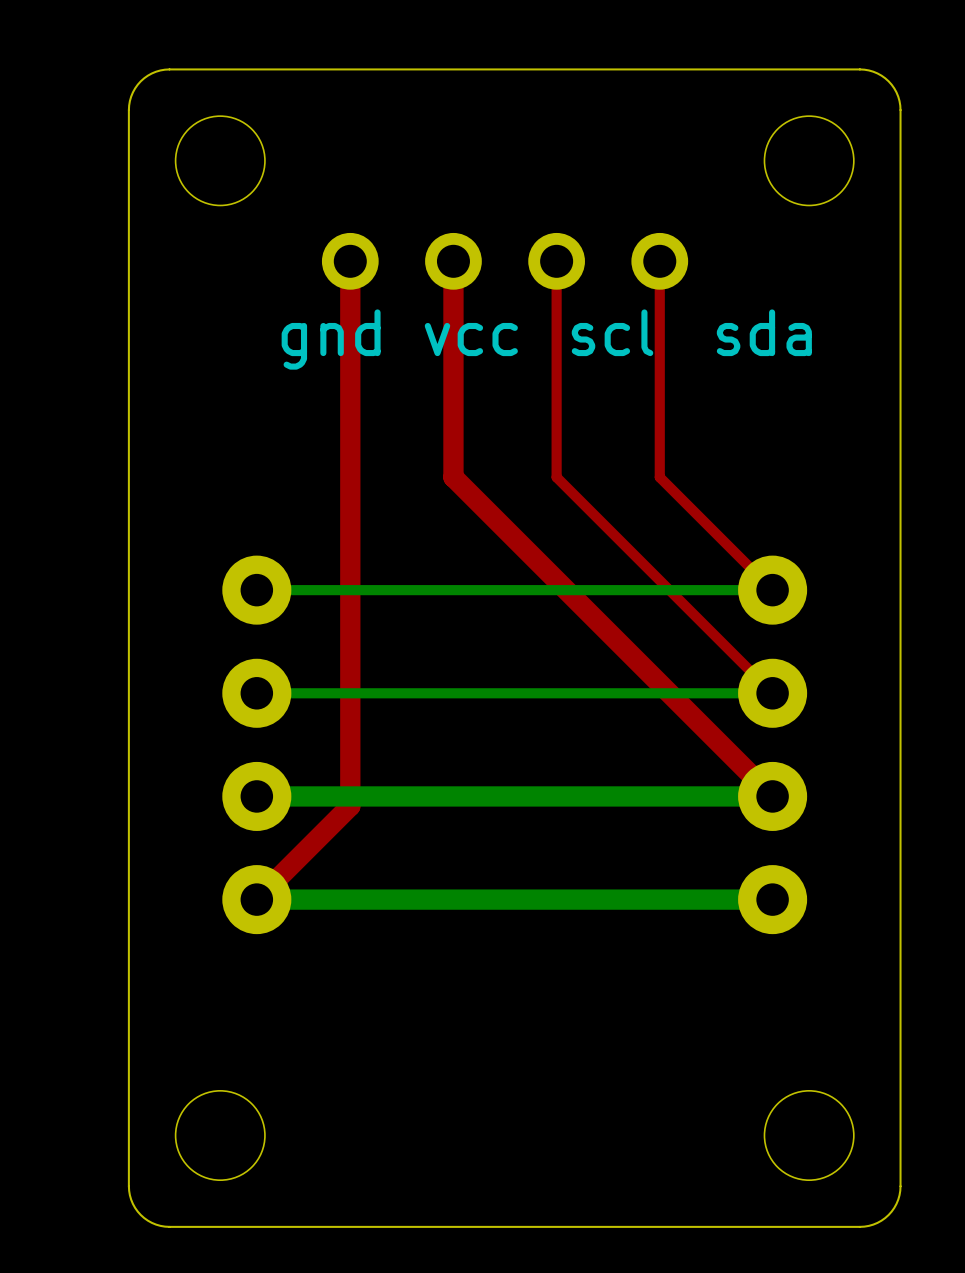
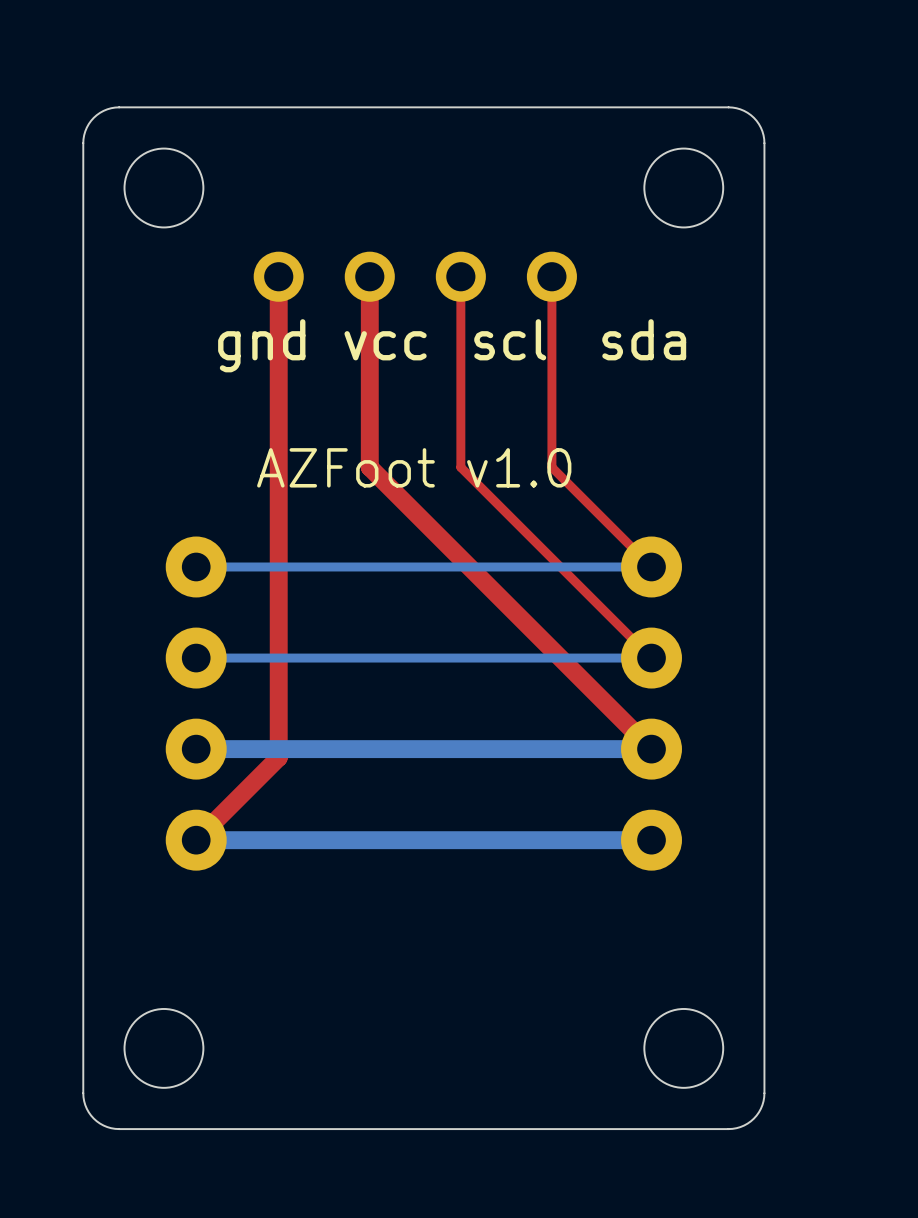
text: none -> AZFoot v1.0 (414, 467)

